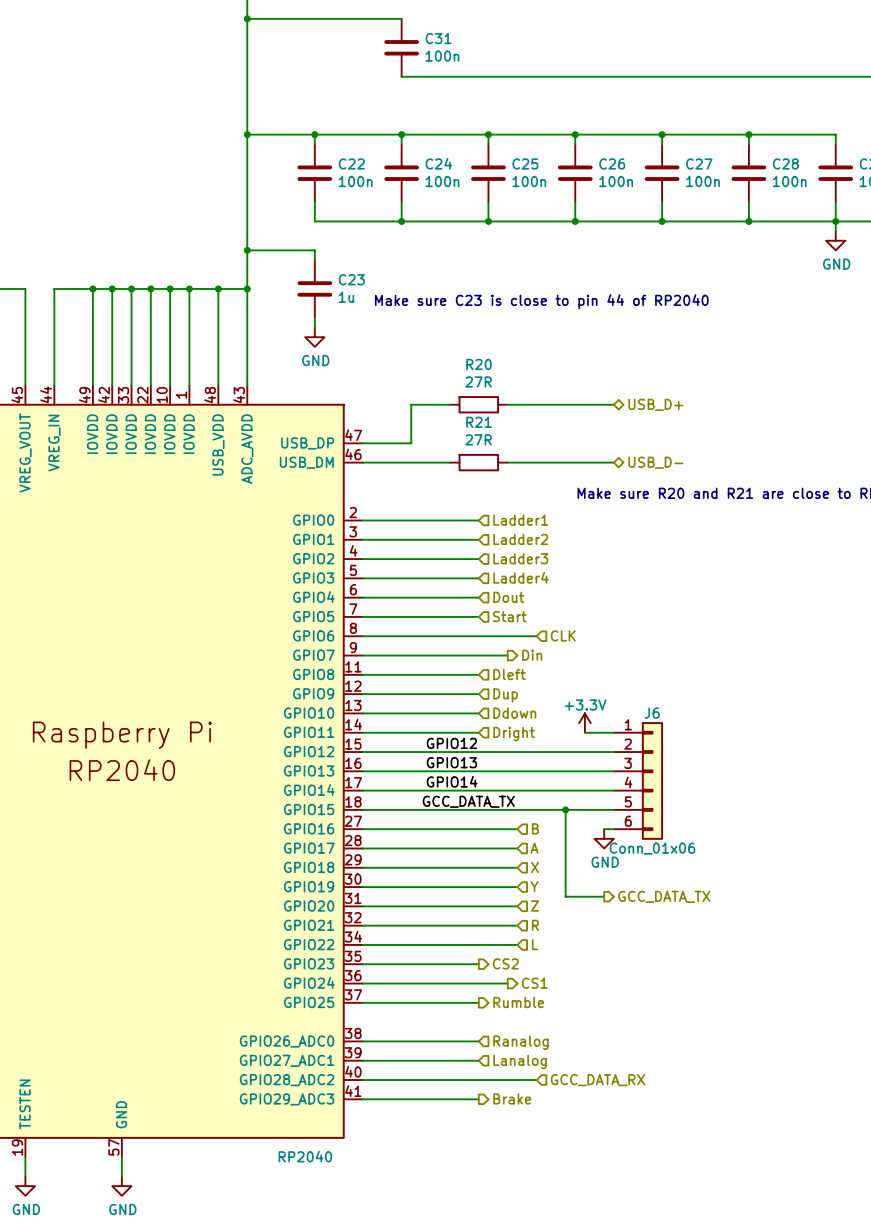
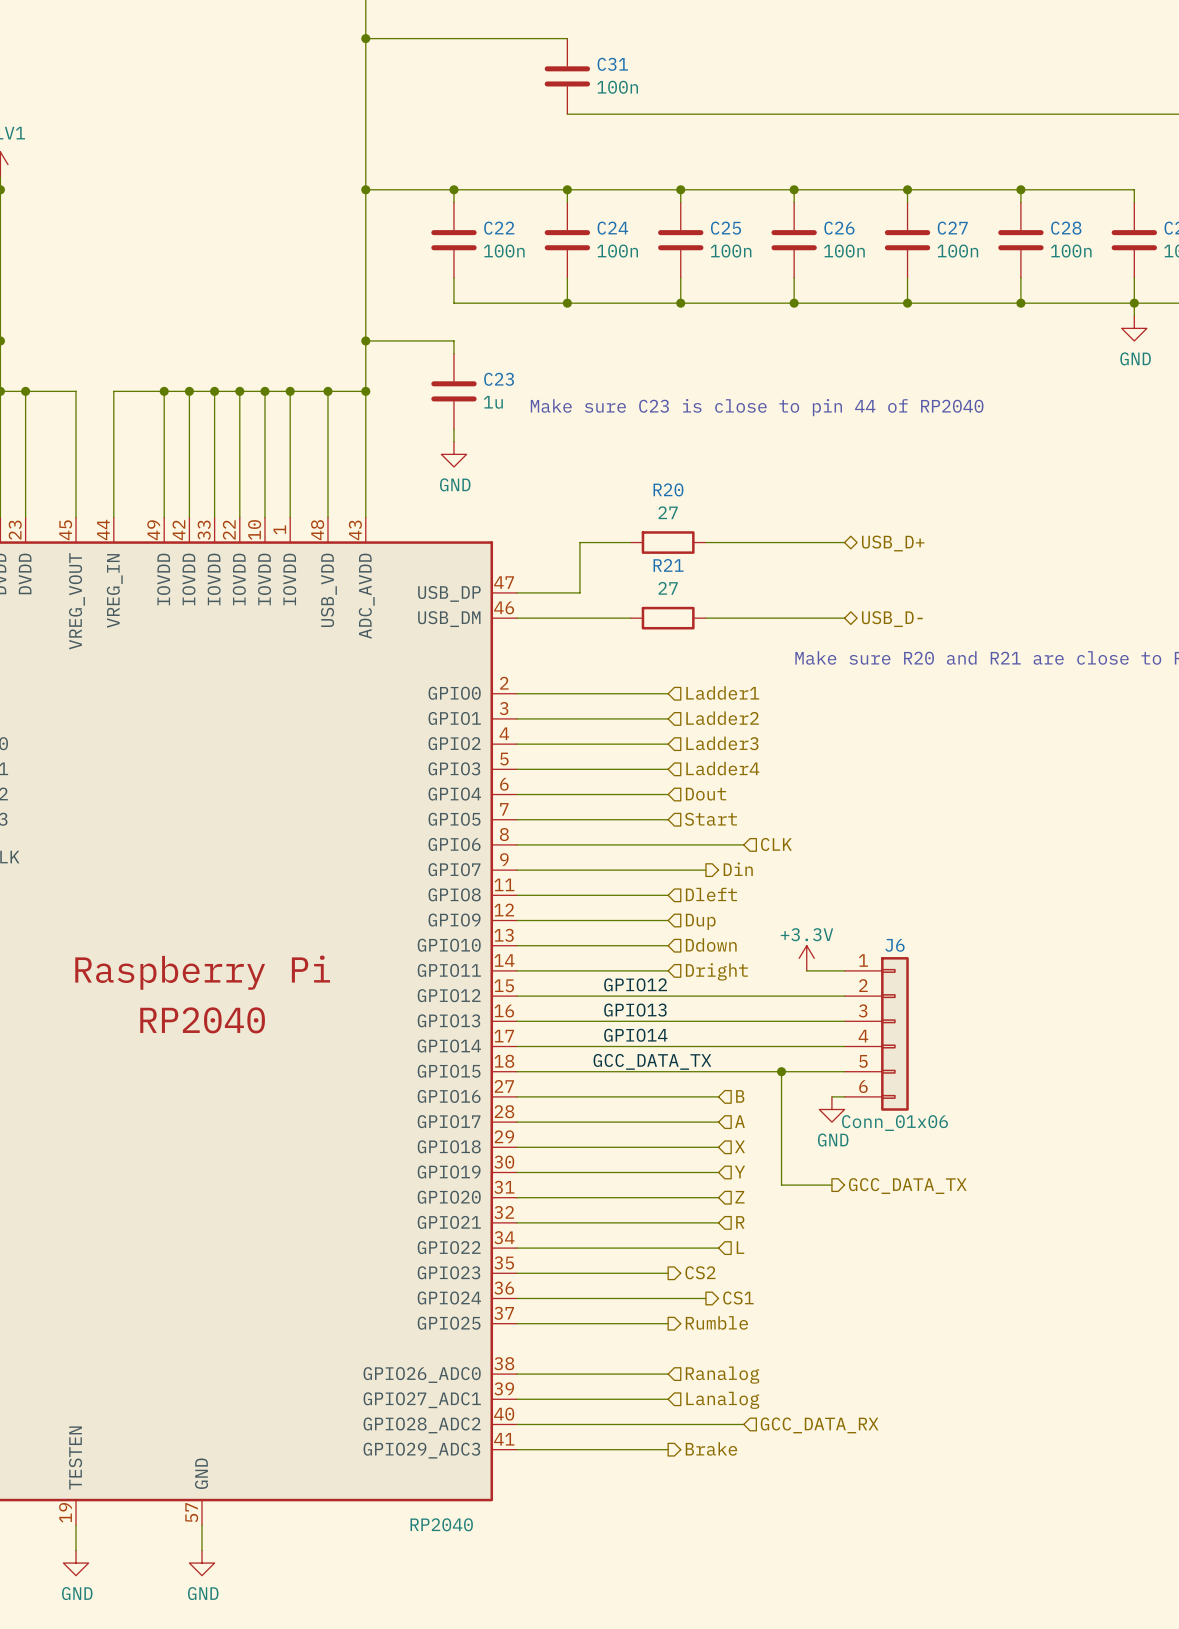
R20 value: 27R (478, 381) -> 27 (668, 512)
R21 value: 27R (478, 439) -> 27 (668, 588)

